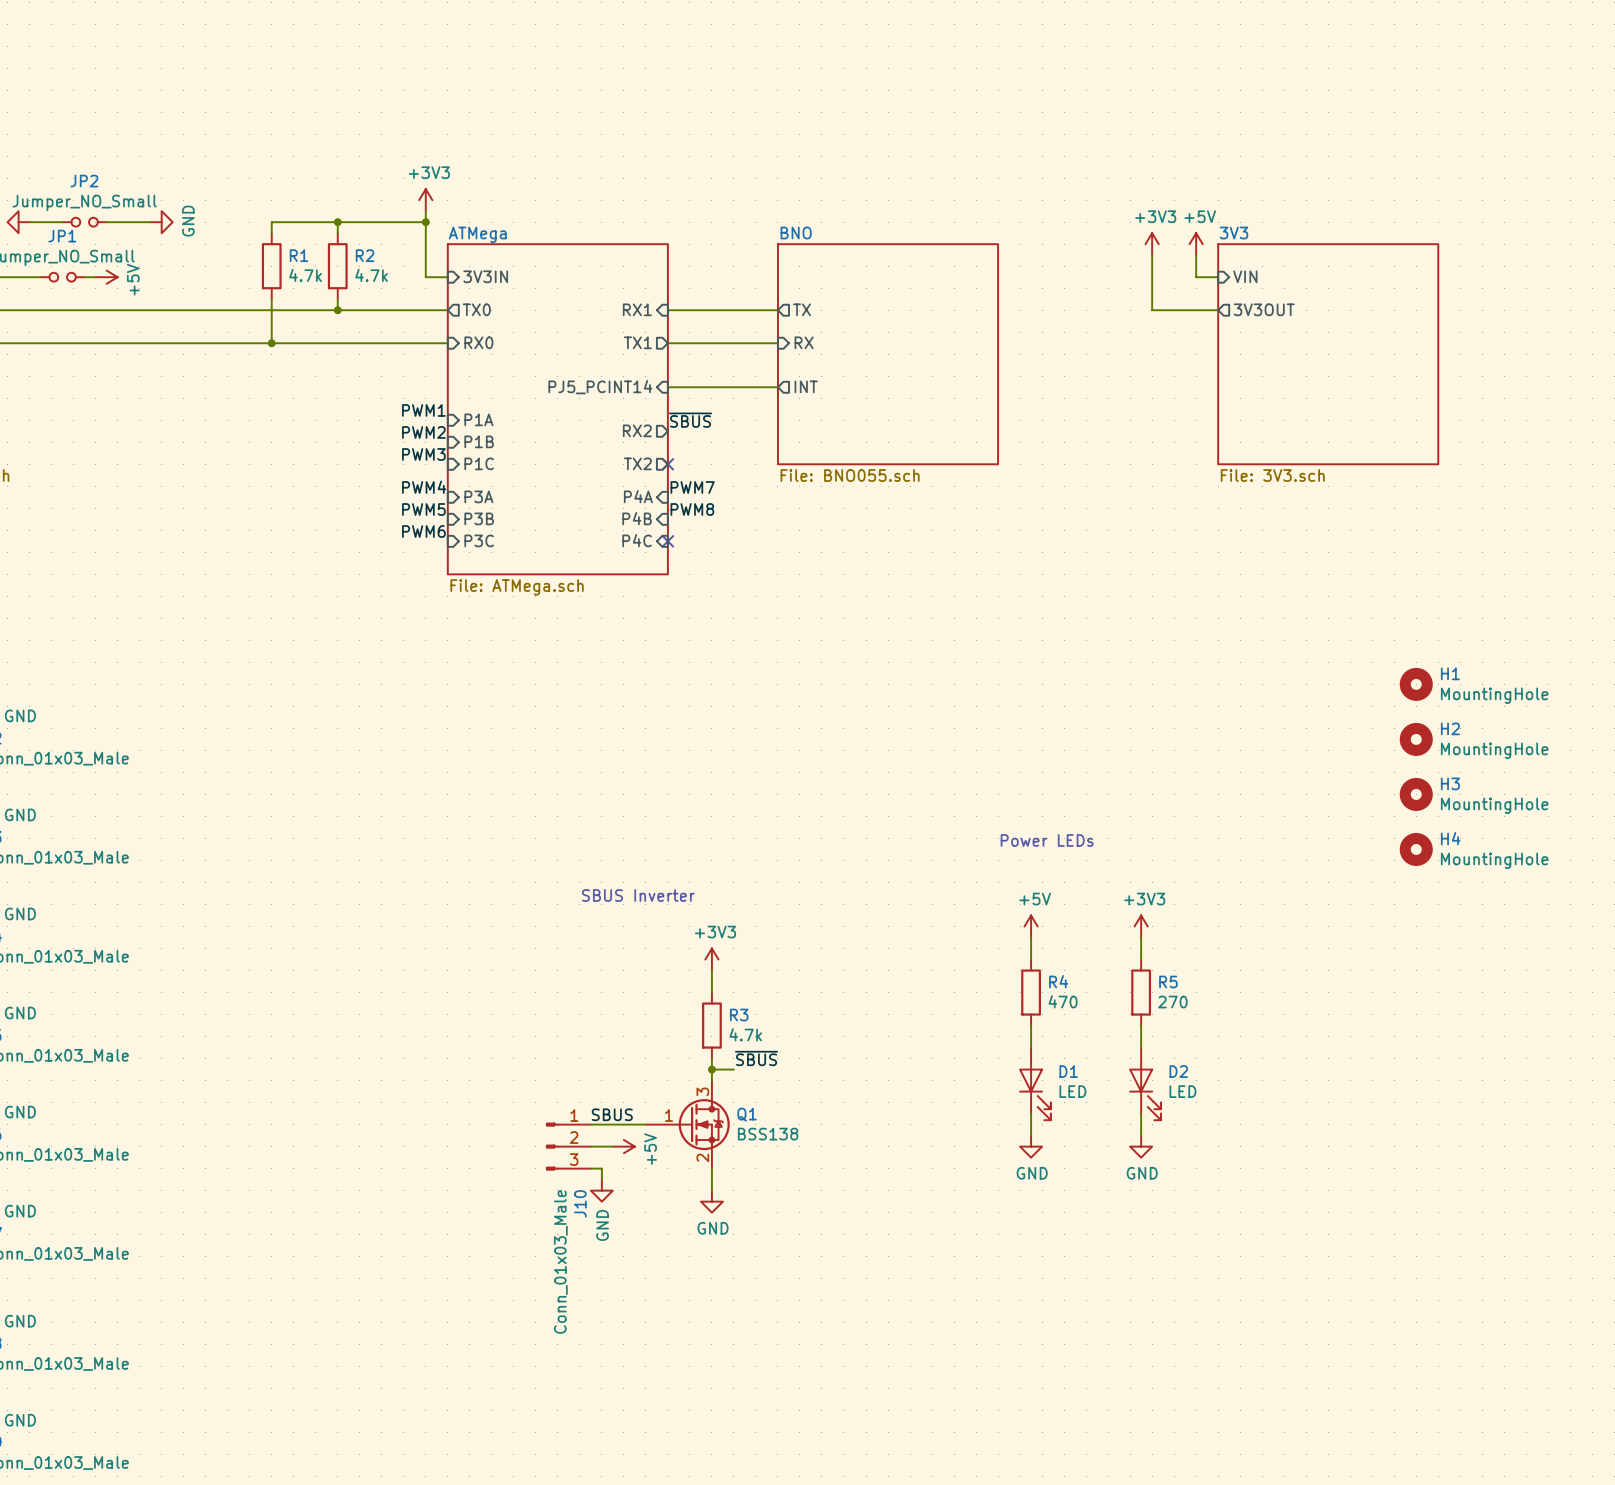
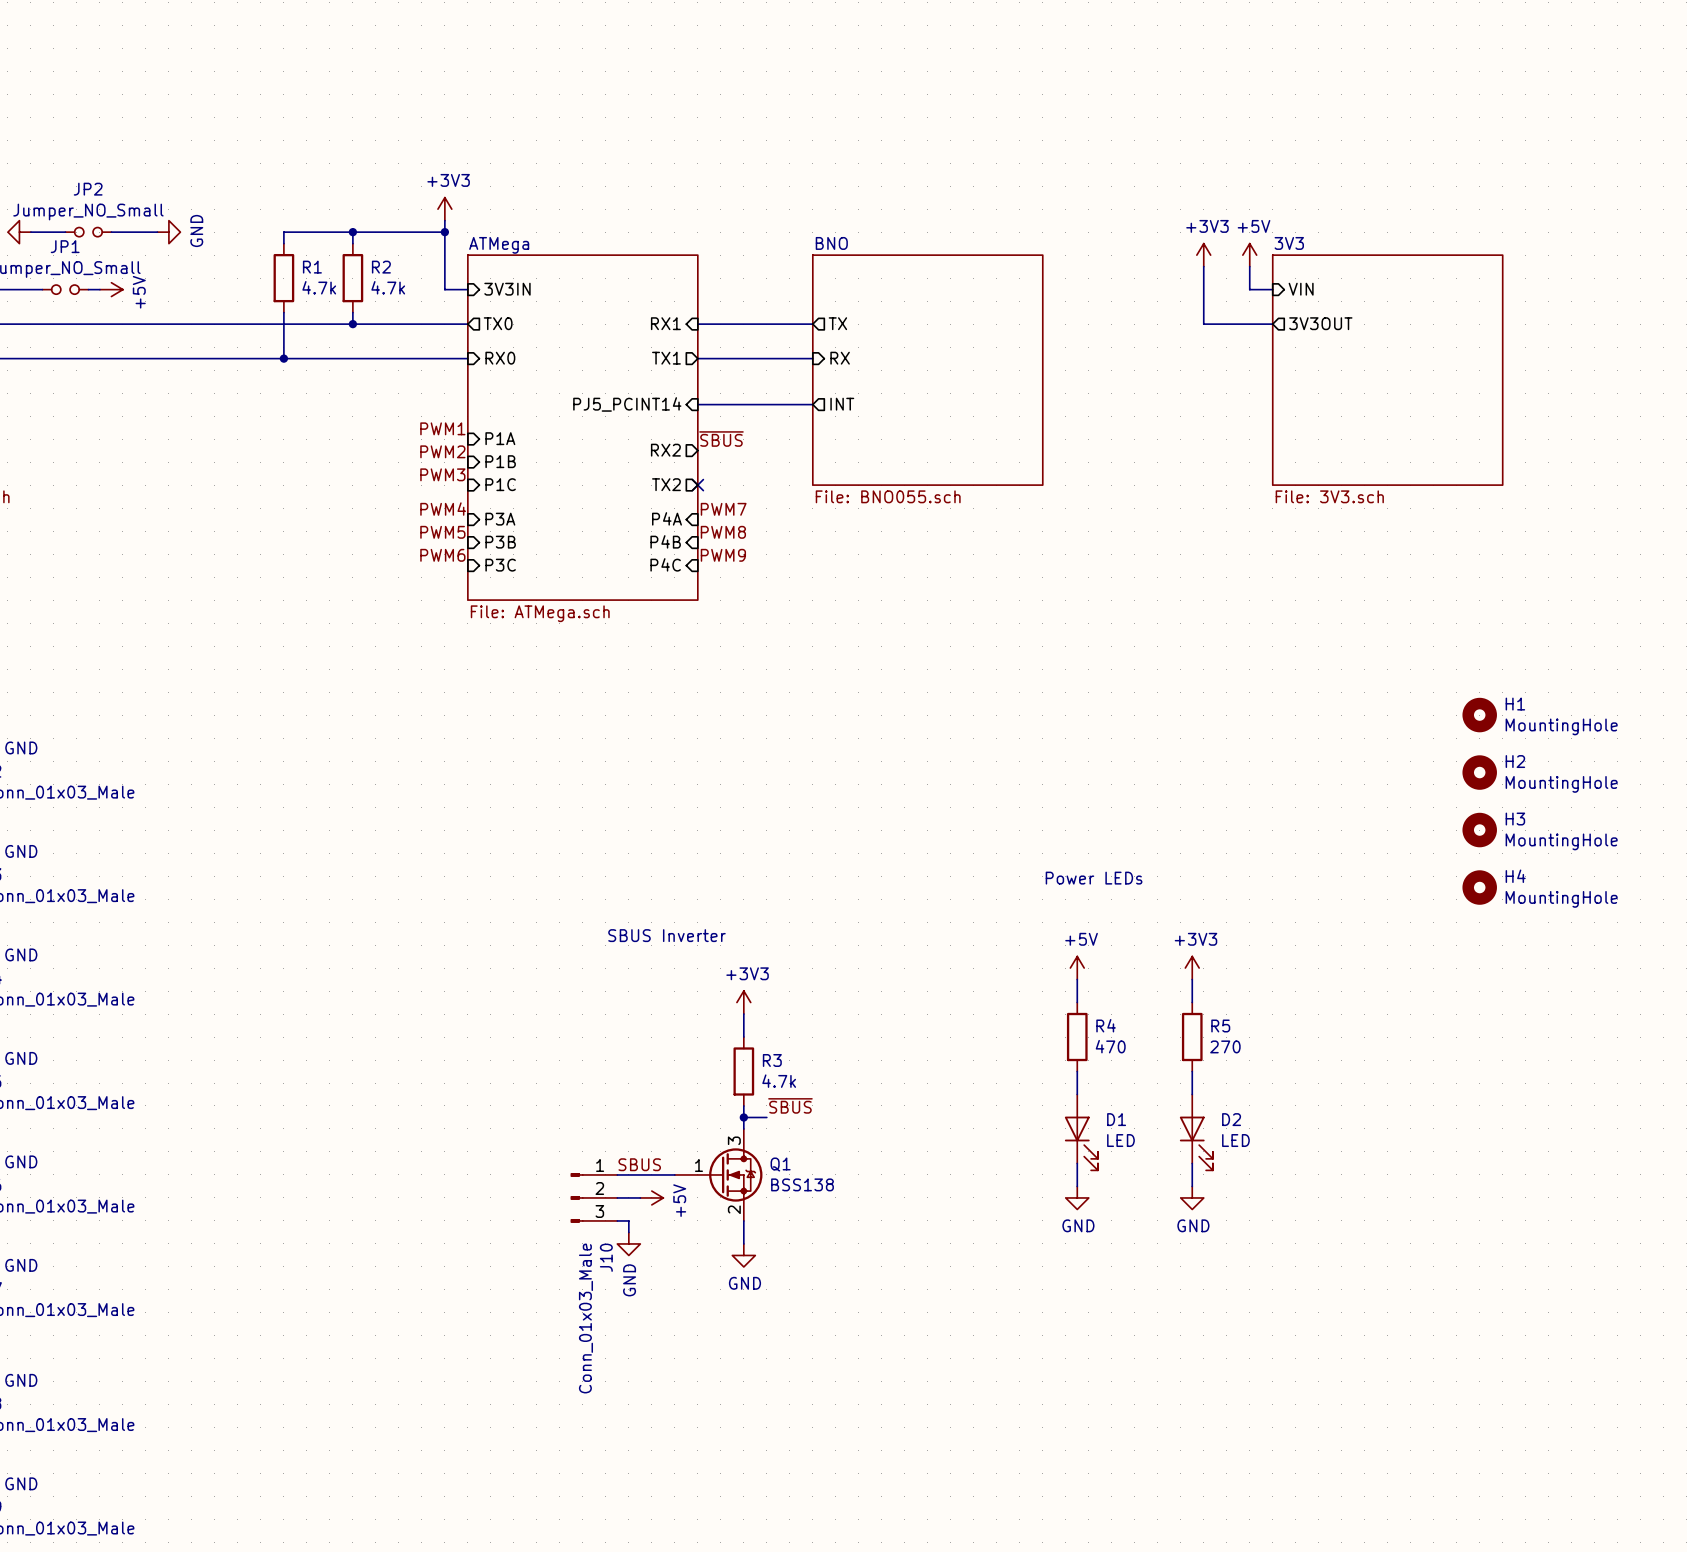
label: none -> PWM9 (723, 555)
no-connect mark: (667, 541) -> none

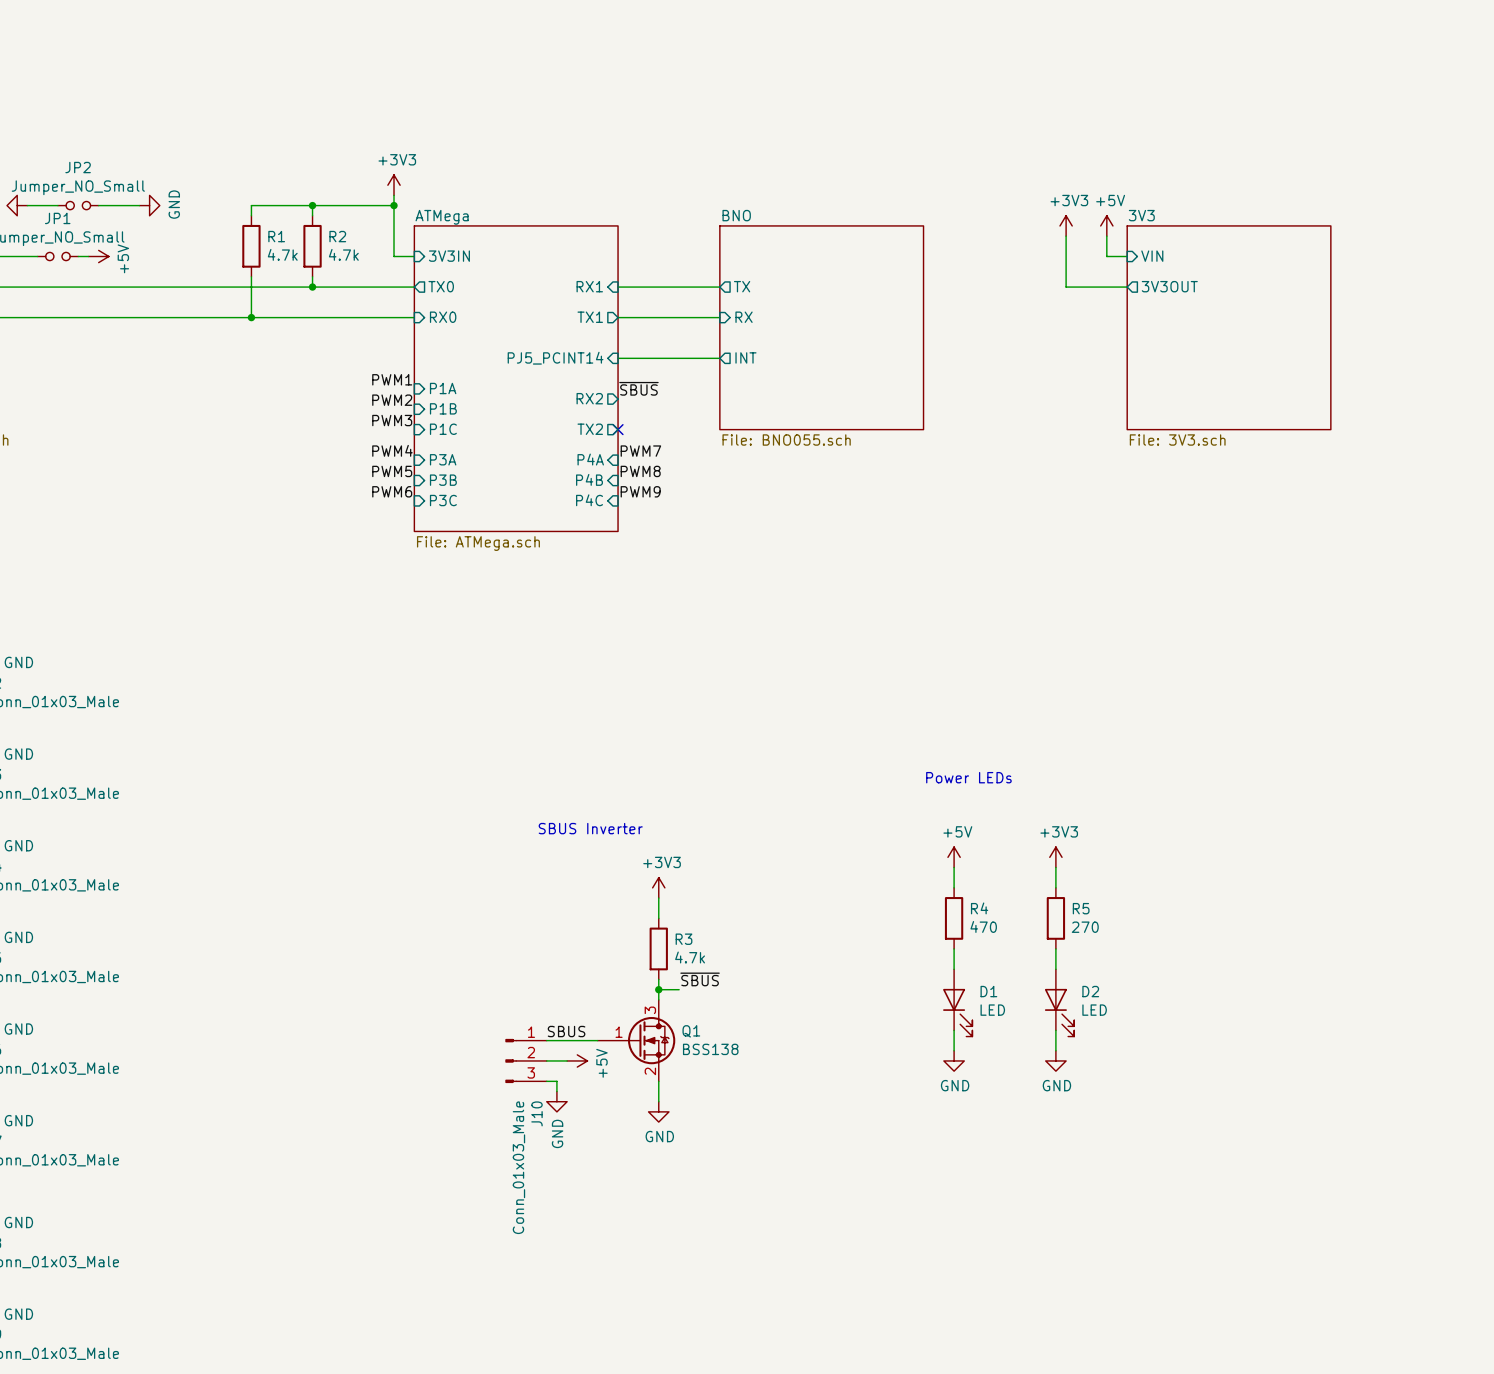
H1: MountingHole (1479, 715) -> none
H2: MountingHole (1479, 772) -> none
H3: MountingHole (1479, 830) -> none
H4: MountingHole (1479, 887) -> none

